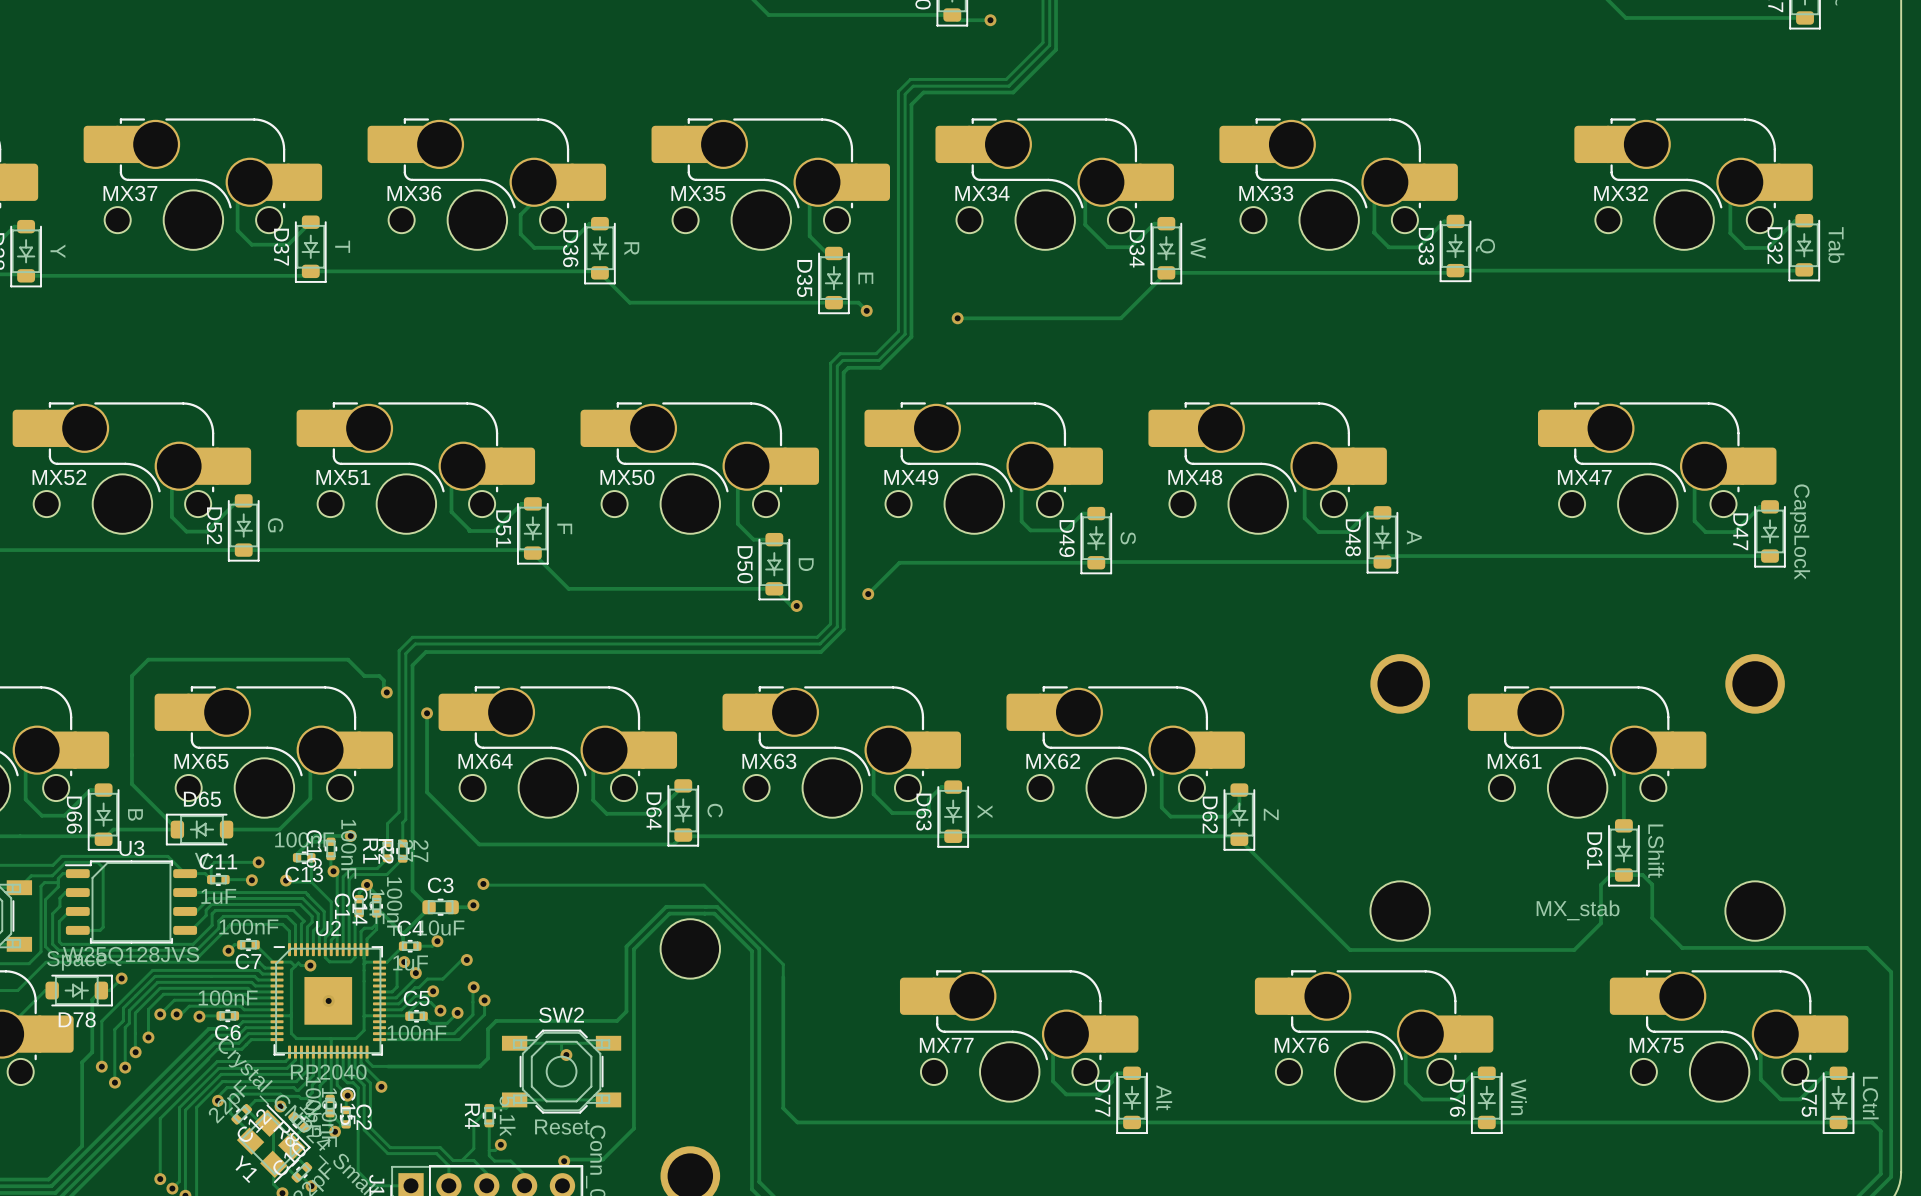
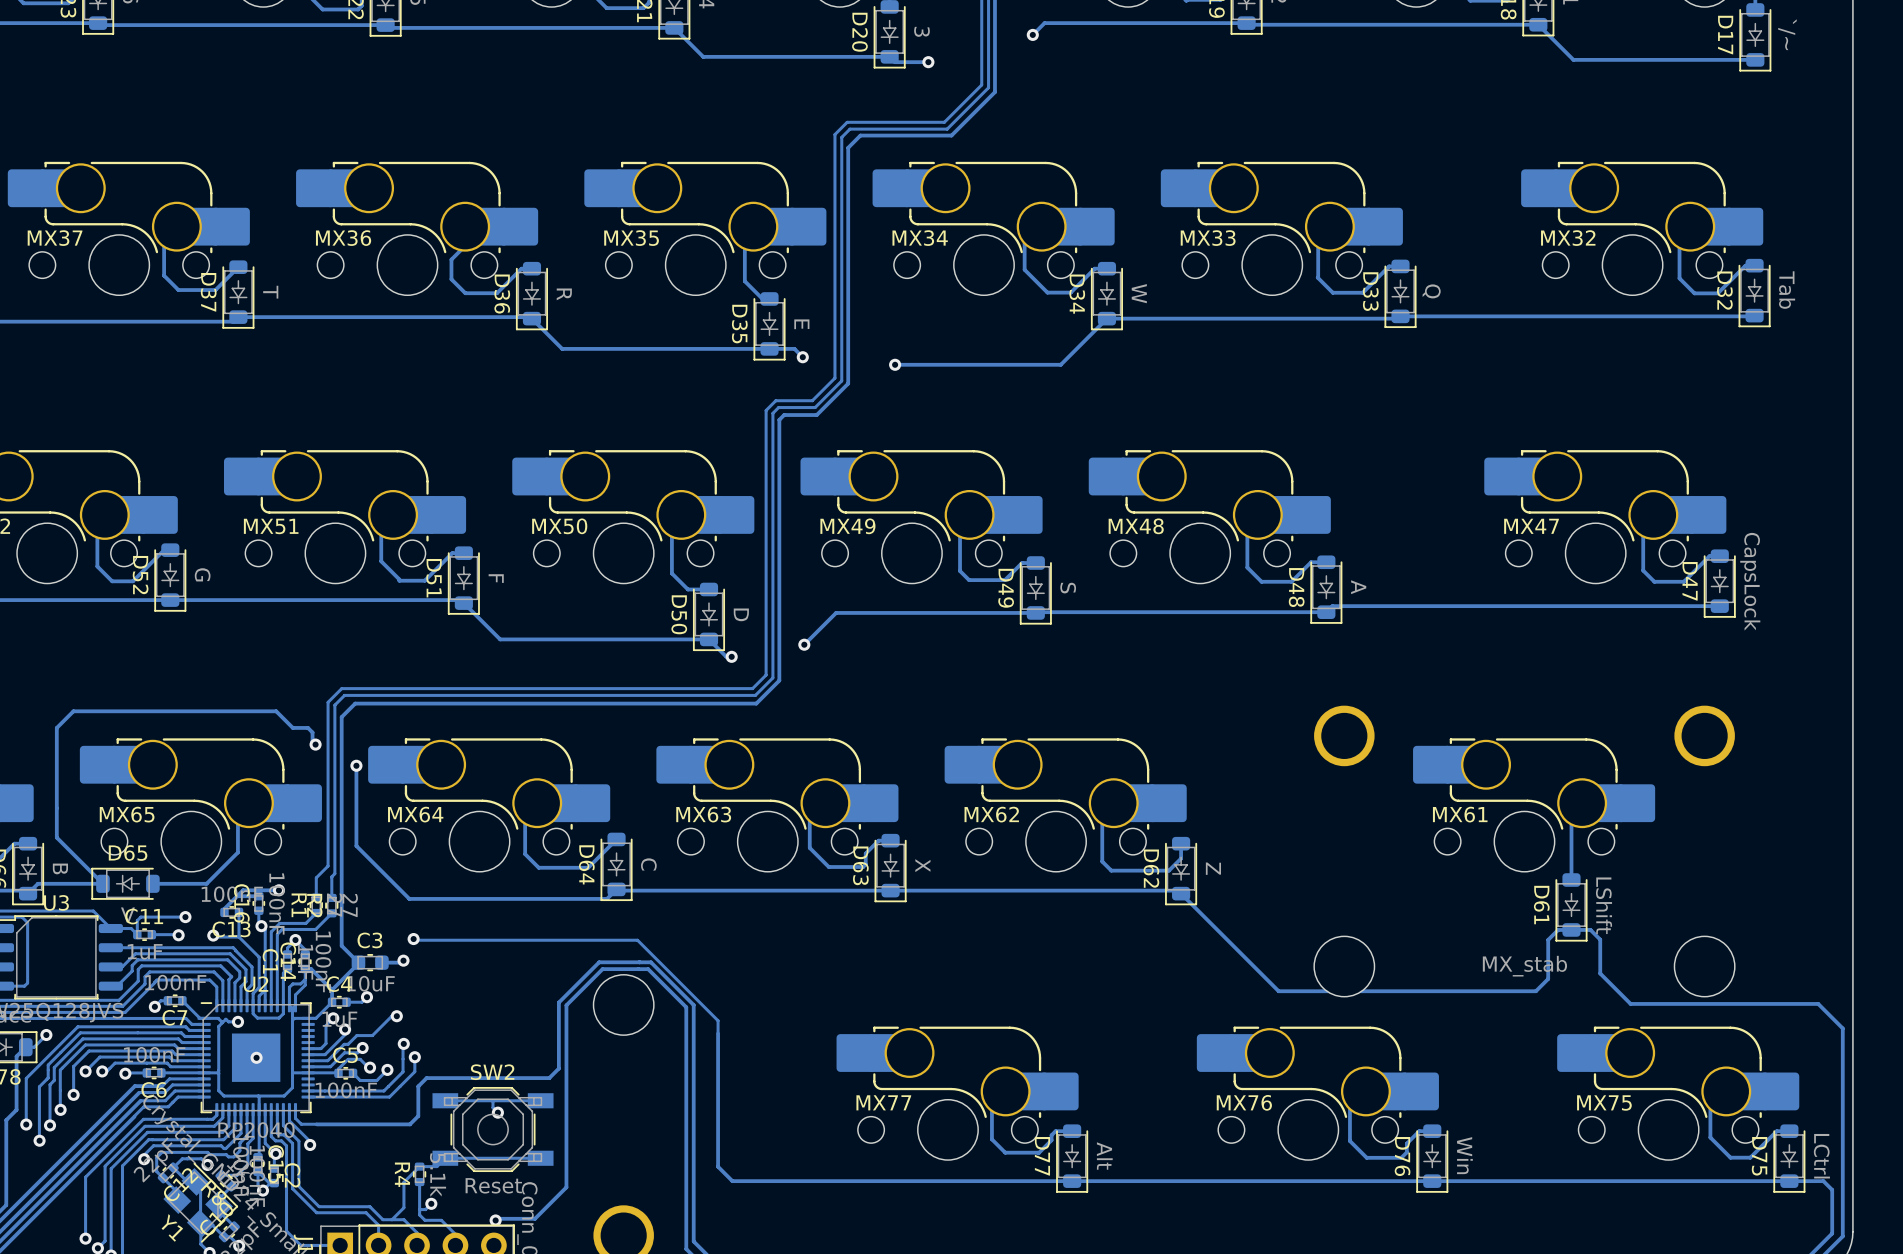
track: (1588, 935) (1574, 949) (1350, 949) (1335, 935) -> (1535, 991) (1278, 991)

